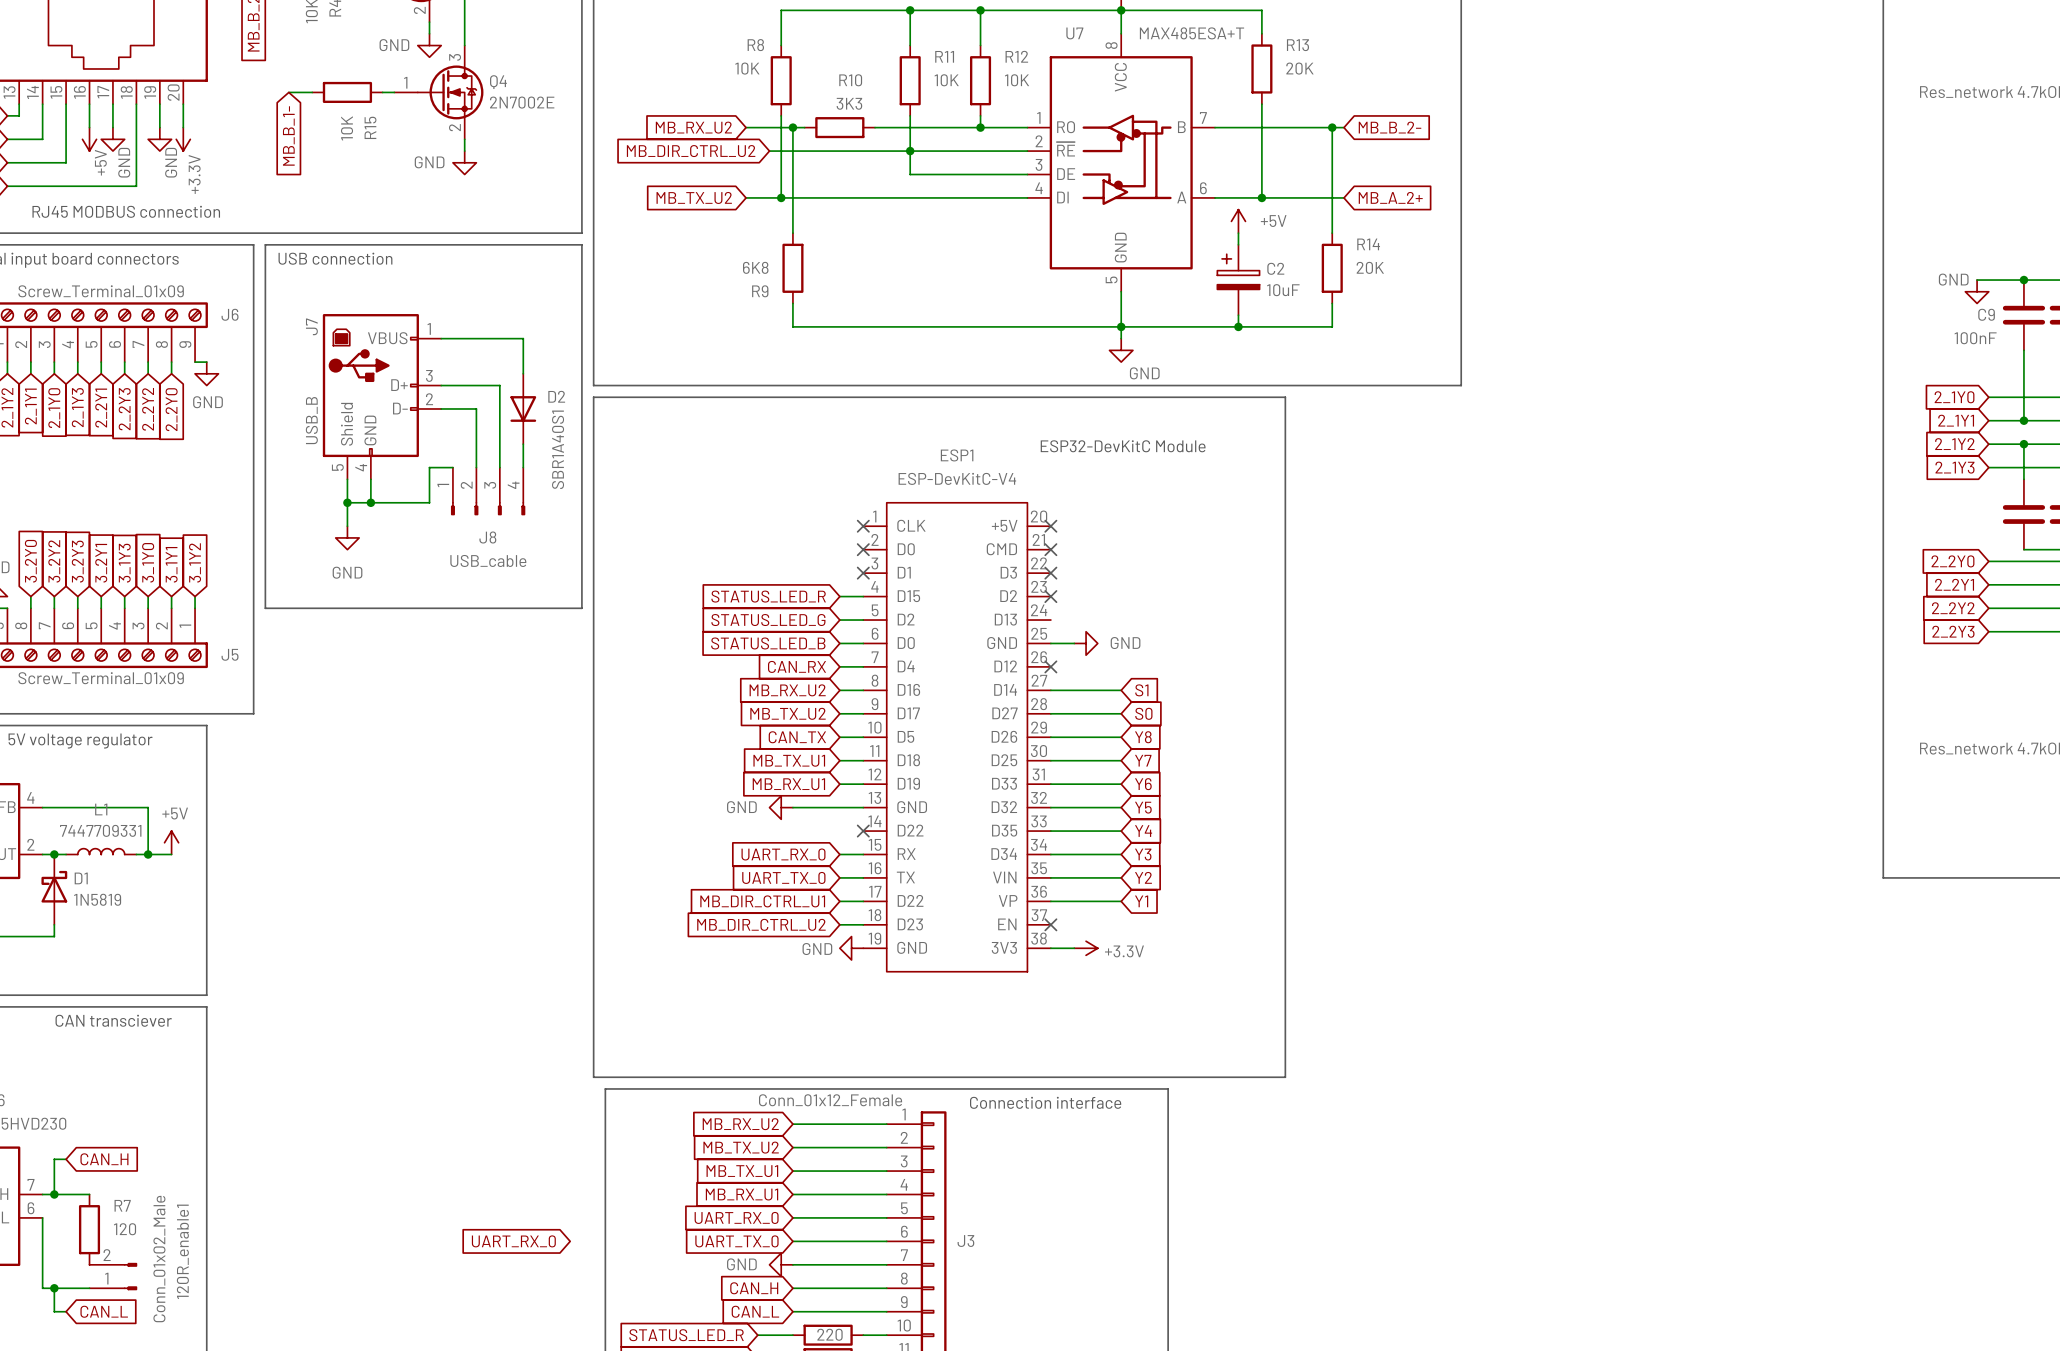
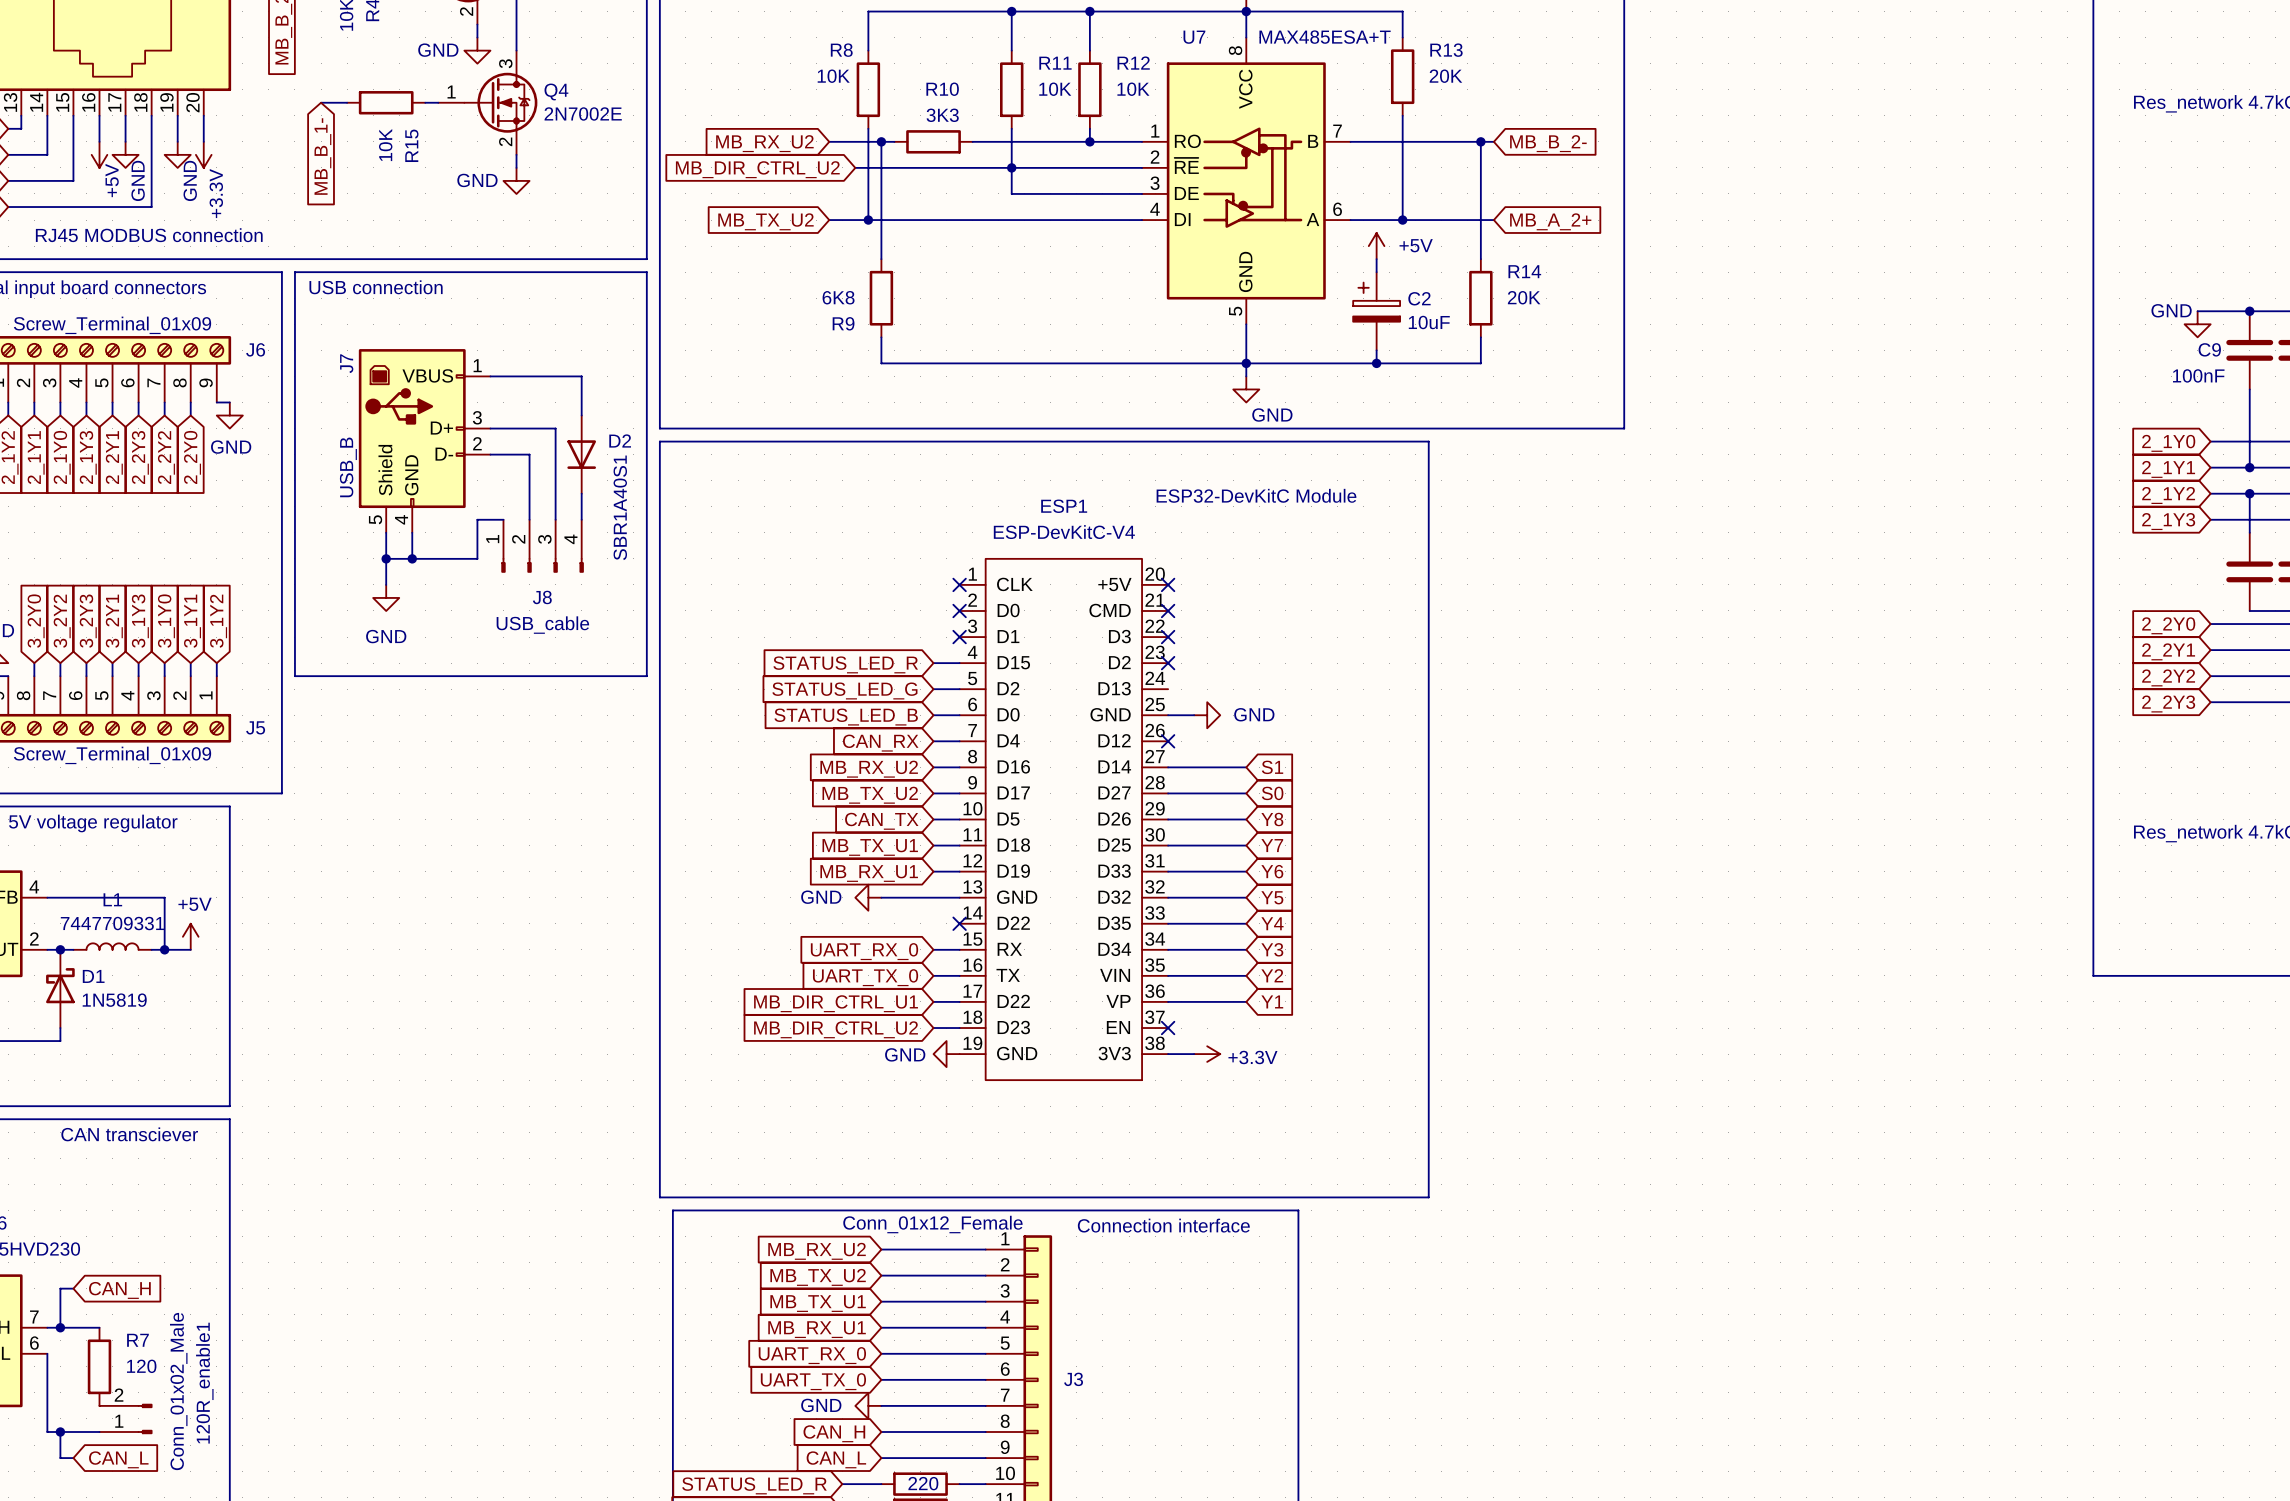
global label: UART_RX_0 (513, 1241) -> none

